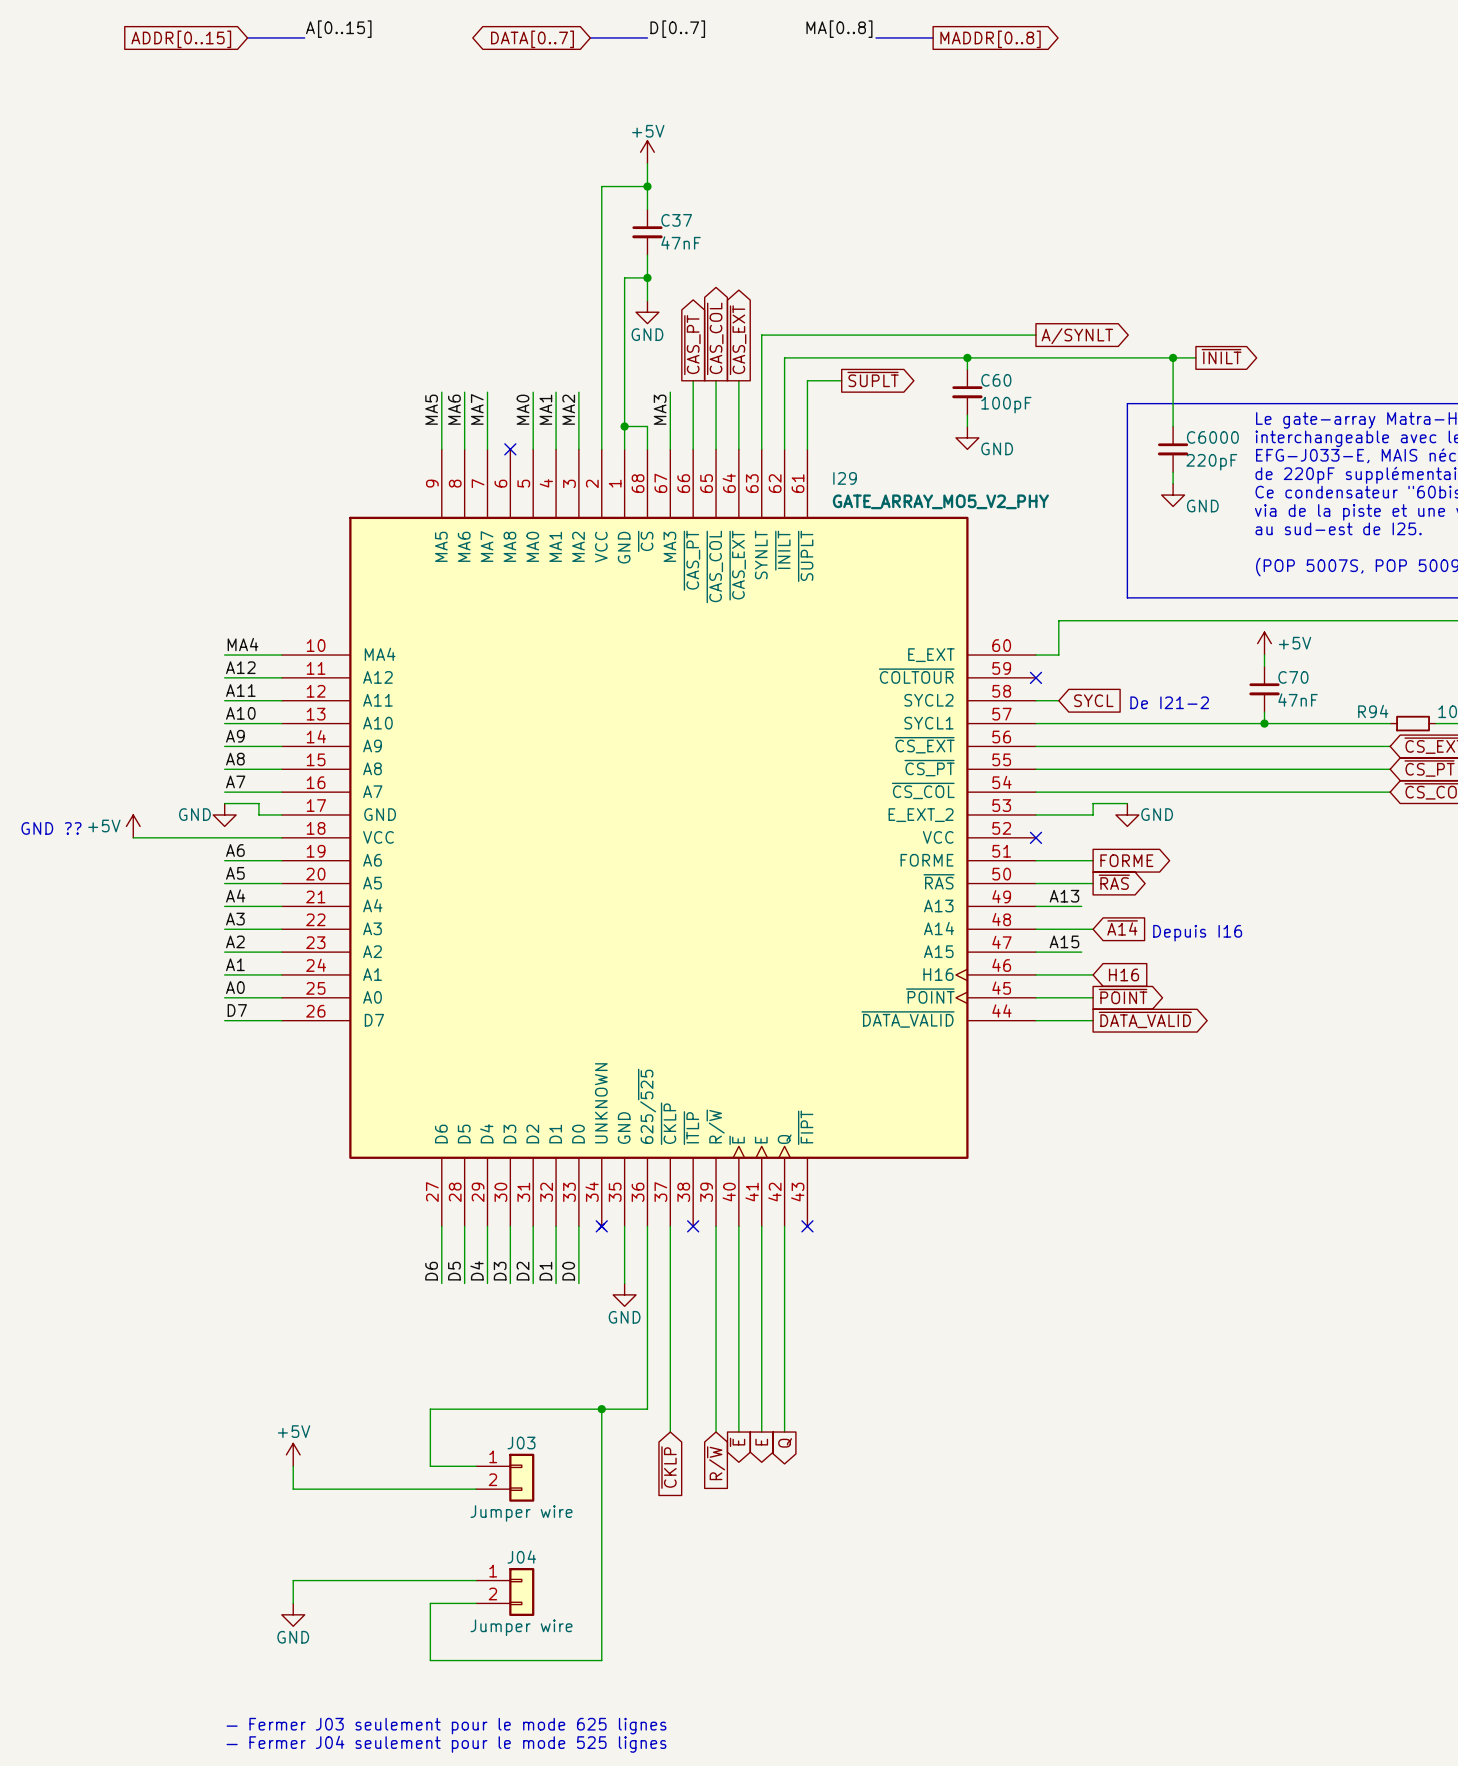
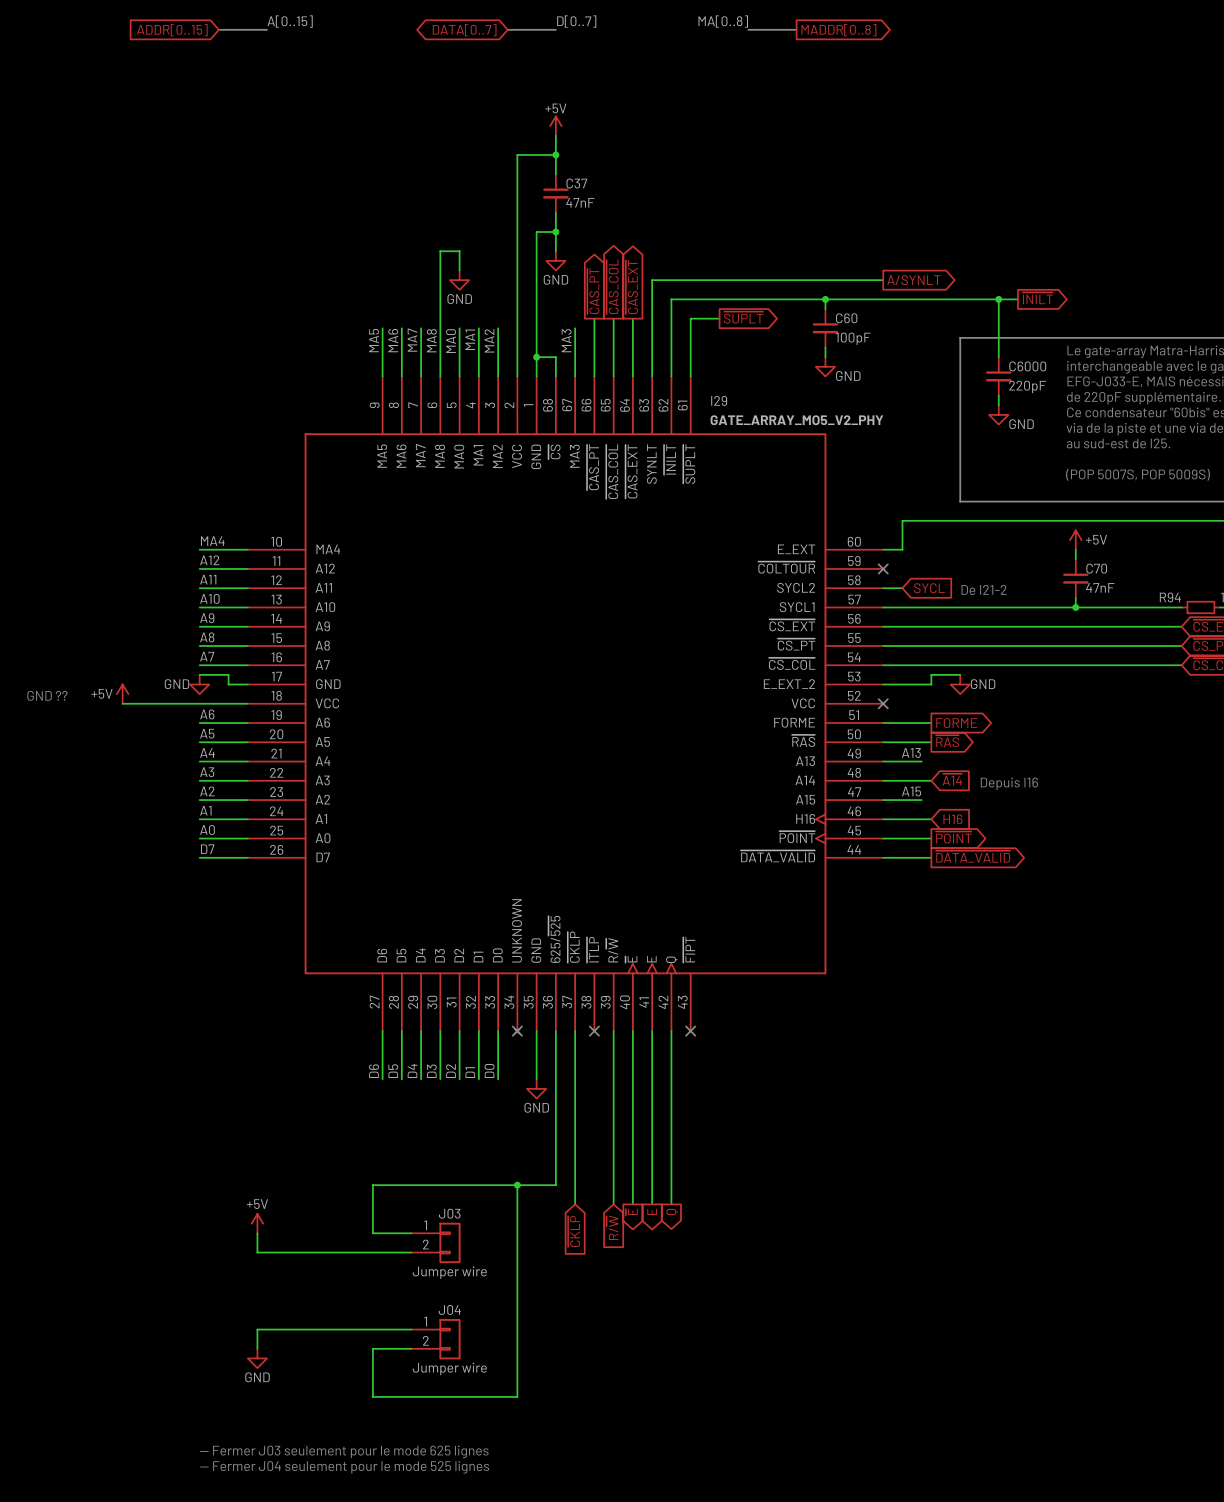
wire: none -> (459, 270) (459, 251) (440, 251) (440, 376)
power symbol: none -> GND (459, 280)
label: none -> MA8 (431, 340)
no-connect mark: (510, 449) -> none

